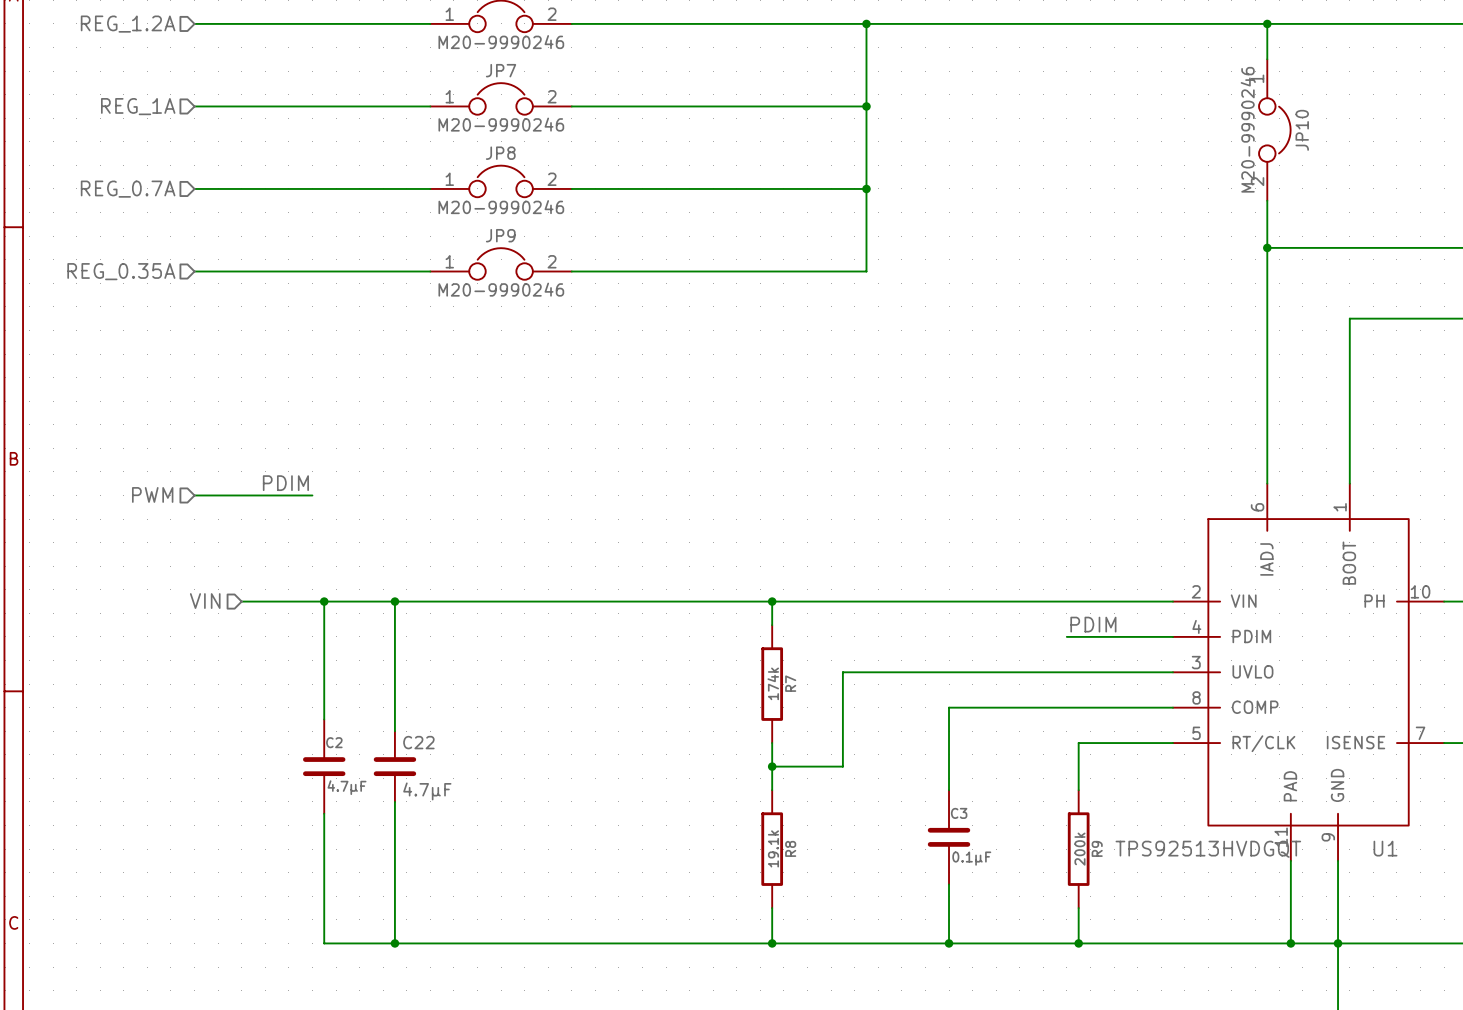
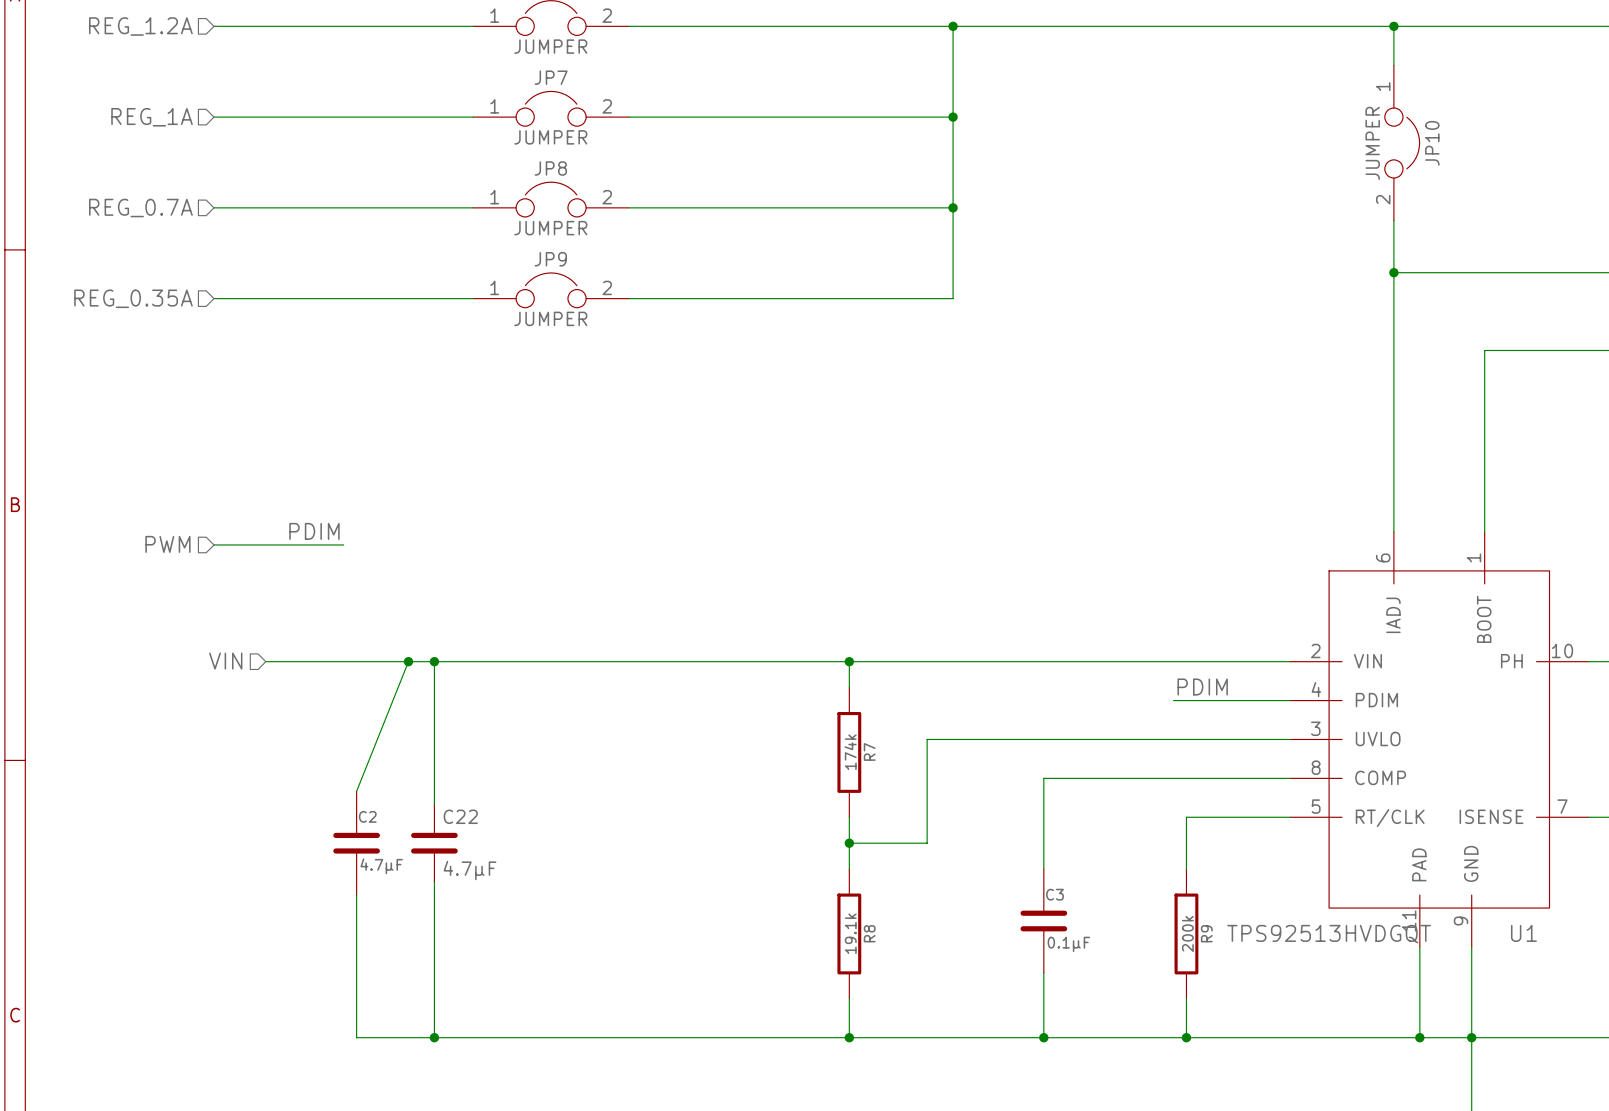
part value: M20-9990246 (501, 42) -> JUMPER (550, 46)
JP7 value: M20-9990246 (501, 124) -> JUMPER (550, 137)
JP10 value: M20-9990246 (1247, 129) -> JUMPER (1372, 143)
JP8 value: M20-9990246 (501, 207) -> JUMPER (550, 228)
JP9 value: M20-9990246 (501, 289) -> JUMPER (550, 318)
wire: (324, 601) (324, 719) -> (408, 661) (356, 791)
junction position: (324, 601) -> (408, 661)

